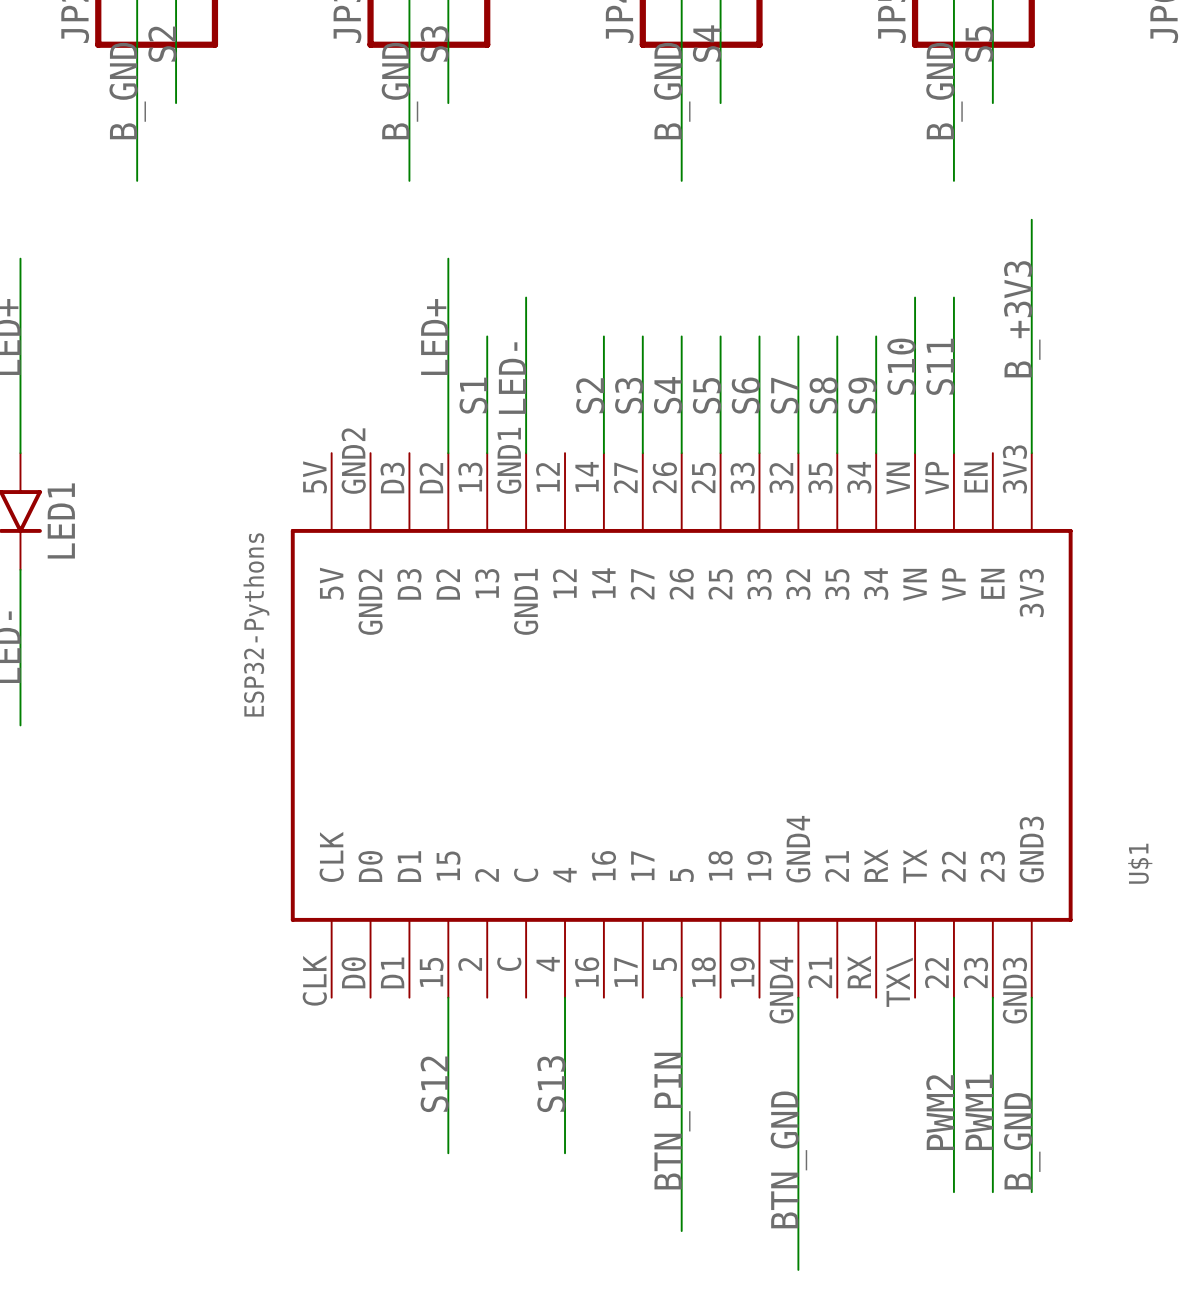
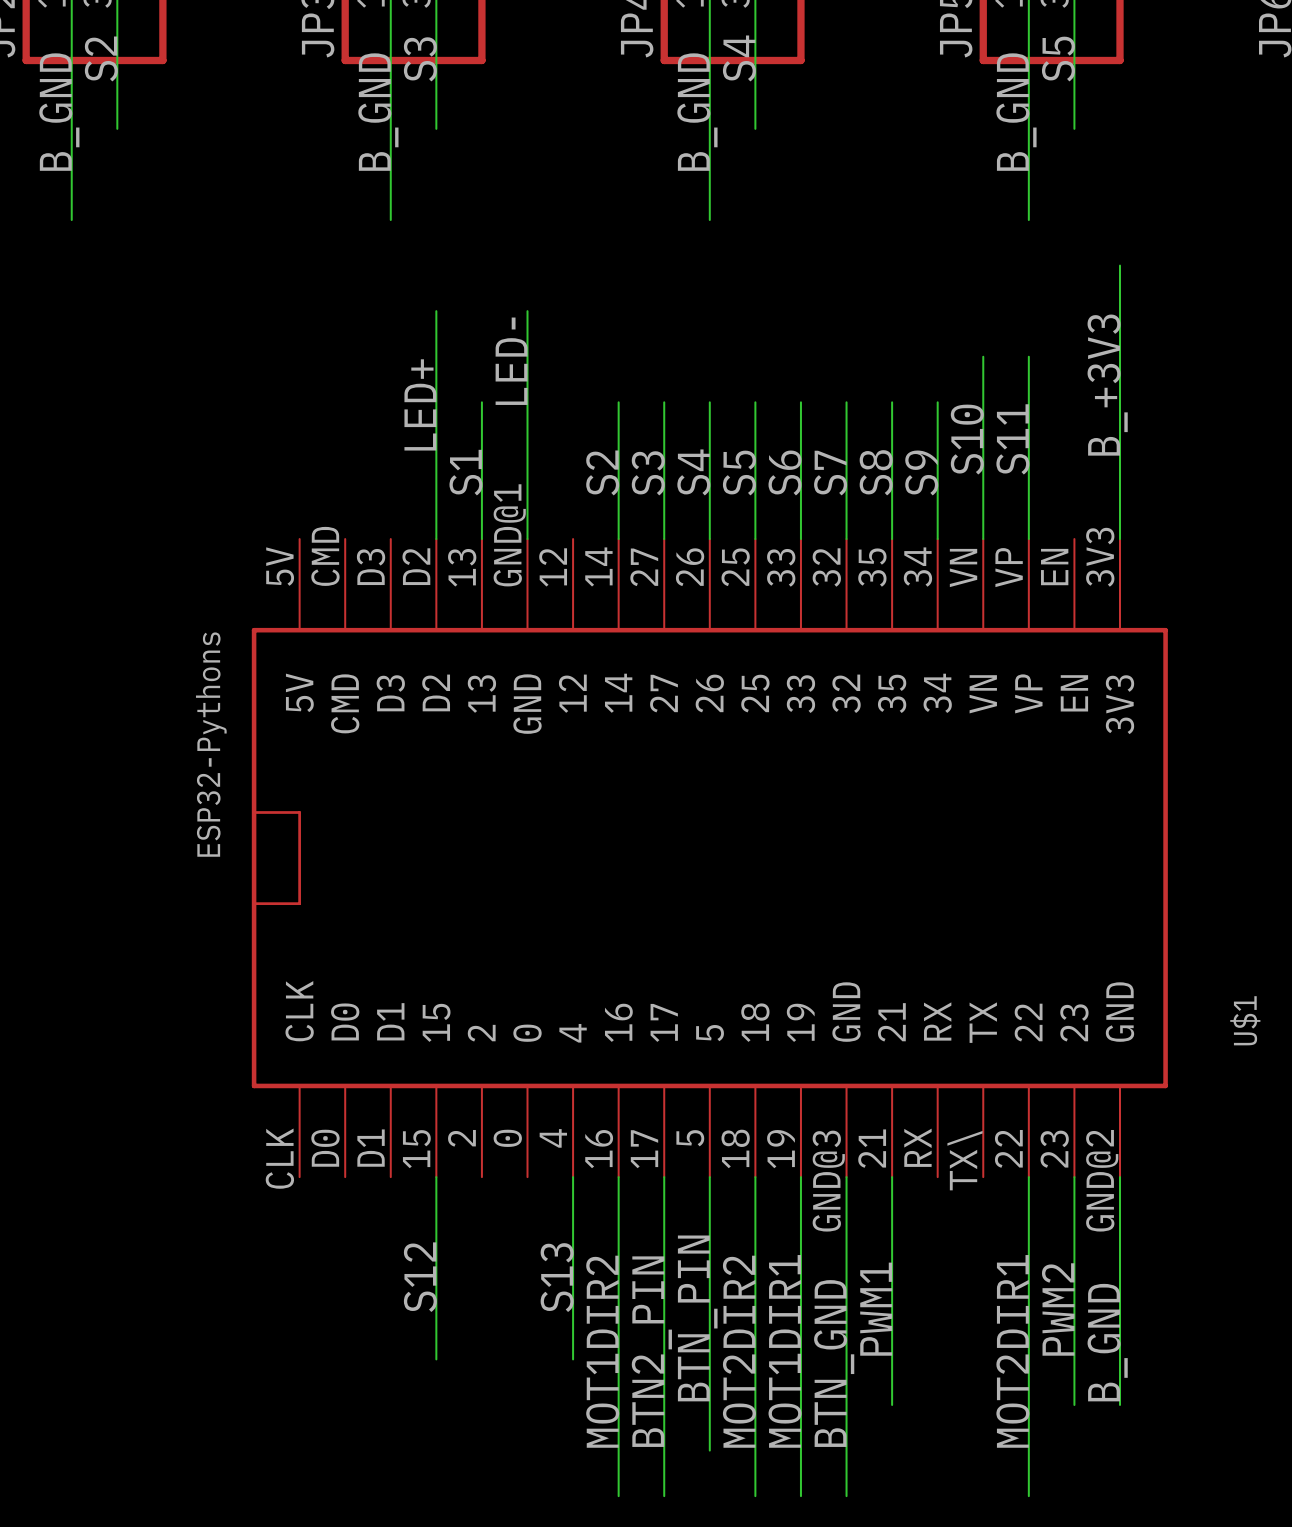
wire: none -> (527, 311) (527, 356)
label position: LED- (512, 378) -> LED- (511, 361)
U$1 symbol: [290, 453, 1073, 998] -> [251, 539, 1168, 1178]
wire: none -> (618, 1177) (618, 1496)
wire: none -> (664, 1177) (664, 1496)
wire: none -> (755, 1177) (755, 1496)
wire: none -> (800, 1177) (800, 1496)
wire: none -> (892, 1177) (892, 1404)
label: none -> PWM1 (876, 1309)
label: PWM2 (940, 1112) -> none
label: PWM1 (979, 1112) -> PWM2 (1058, 1309)
label: none -> BTN2_PIN (651, 1351)
label: none -> MOT1DIR2 (602, 1351)
label: none -> MOT2DIR2 (739, 1351)
label: none -> MOT1DIR1 (785, 1351)
label: none -> MOT2DIR1 (1012, 1351)
wire: none -> (1028, 1404) (1028, 1496)

